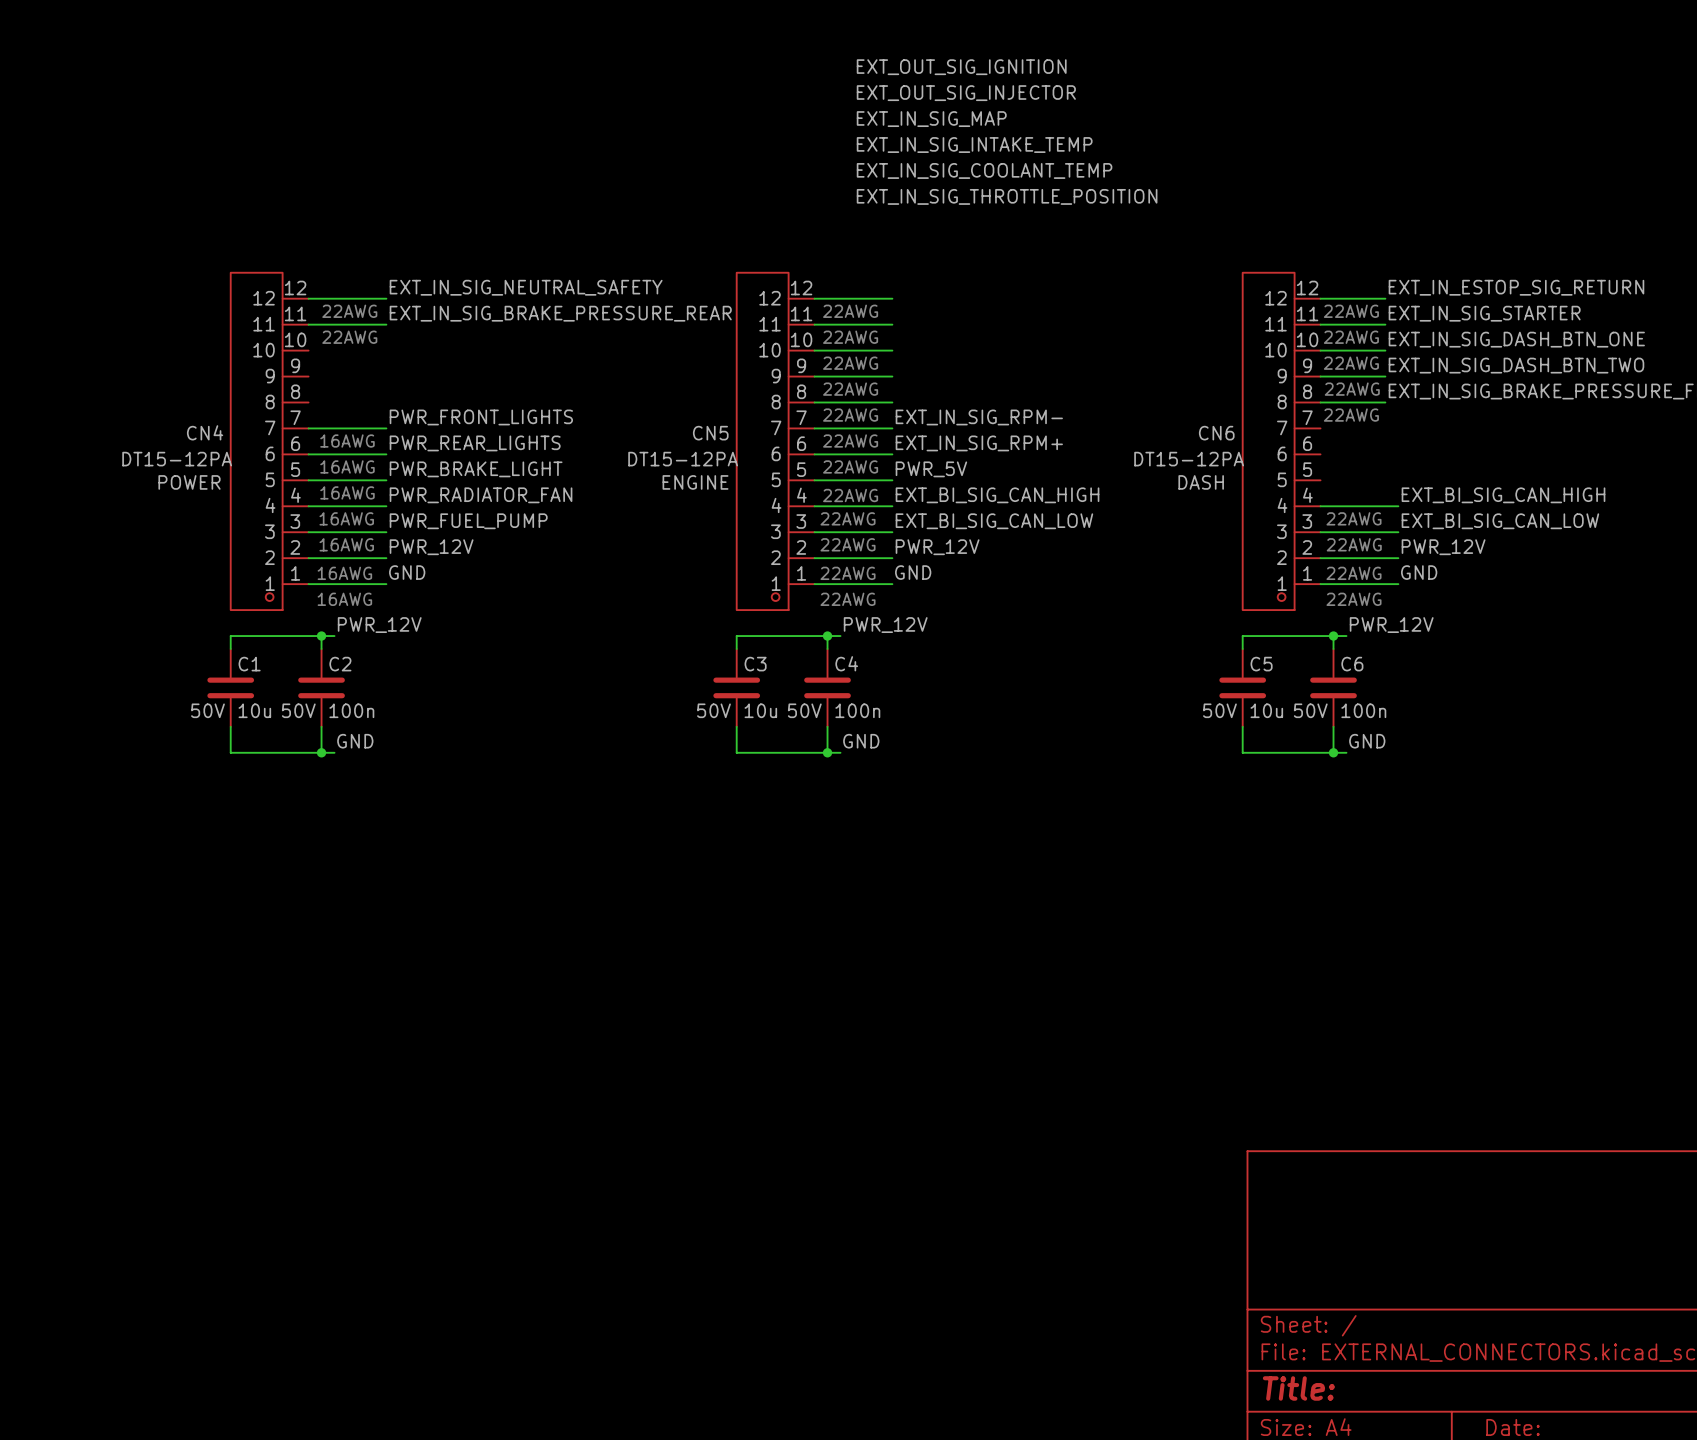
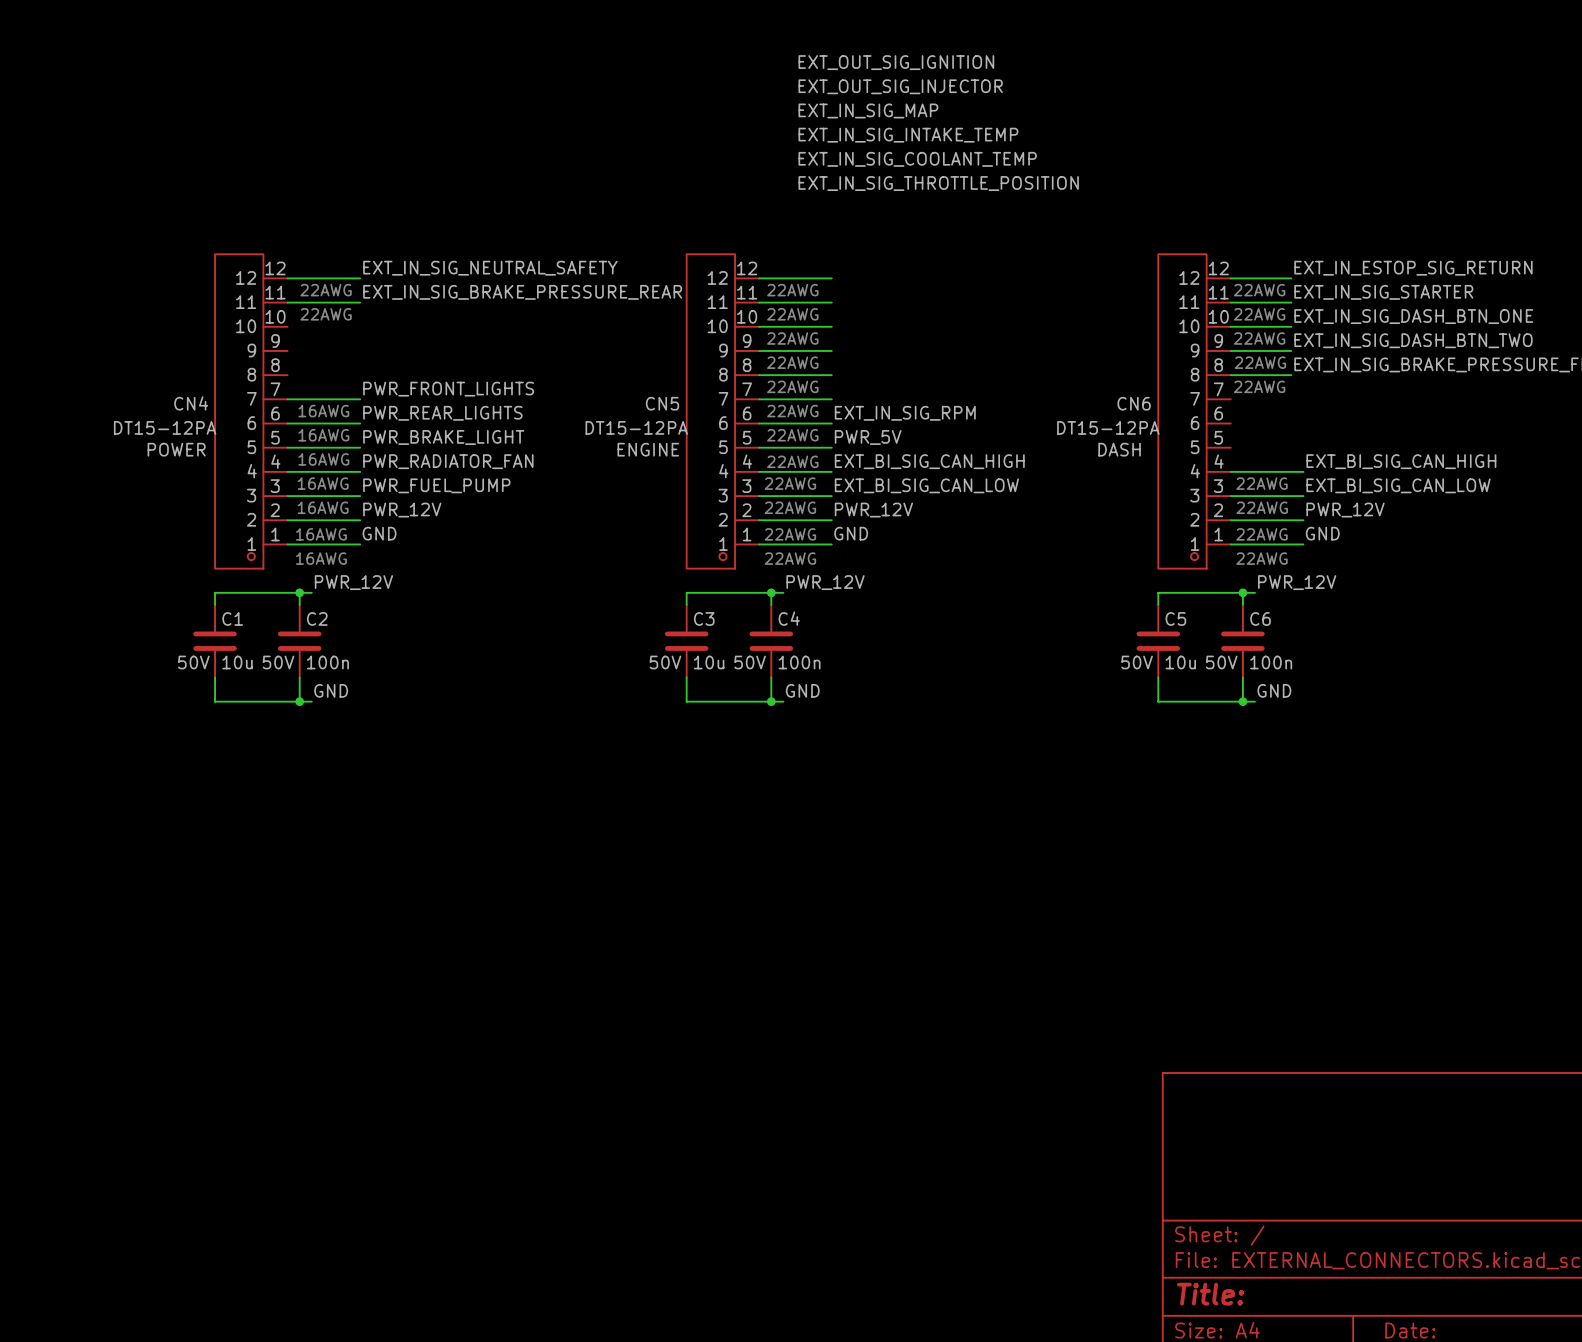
label: EXT_IN_SIG_RPM- (979, 417) -> none
label: EXT_IN_SIG_RPM+ (979, 443) -> EXT_IN_SIG_RPM (905, 413)

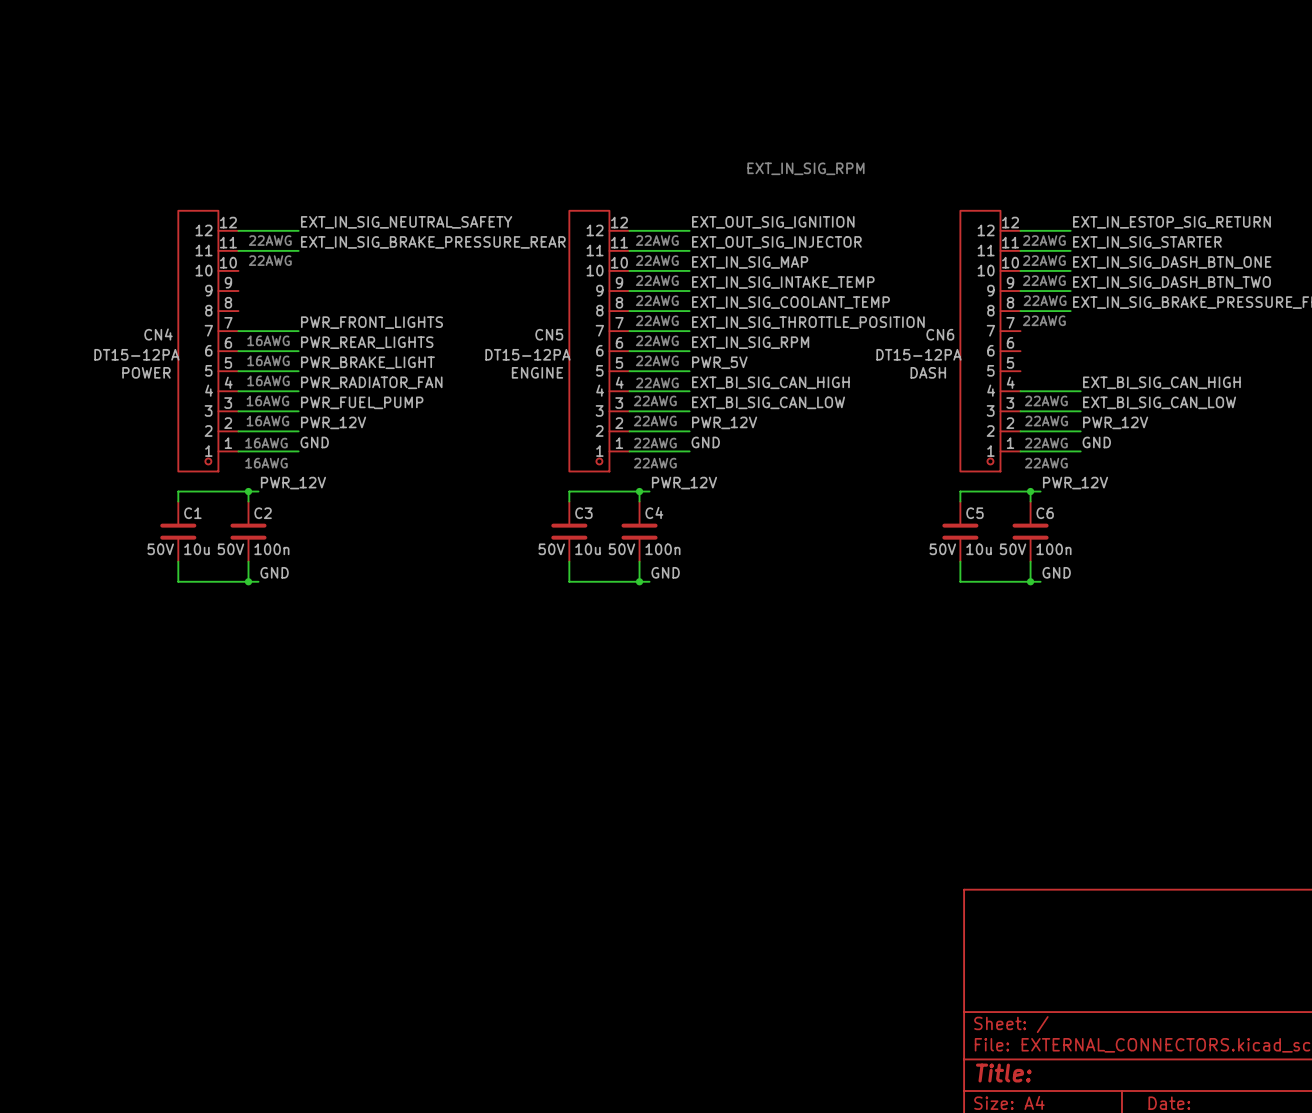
label position: EXT_OUT_SIG_IGNITION (896, 62) -> EXT_OUT_SIG_IGNITION (773, 222)
label position: EXT_OUT_SIG_INJECTOR (900, 86) -> EXT_OUT_SIG_INJECTOR (776, 242)
label position: EXT_IN_SIG_MAP (868, 110) -> EXT_IN_SIG_MAP (750, 262)
label position: EXT_IN_SIG_INTAKE_TEMP (908, 135) -> EXT_IN_SIG_INTAKE_TEMP (783, 282)
label position: EXT_IN_SIG_COOLANT_TEMP (917, 159) -> EXT_IN_SIG_COOLANT_TEMP (790, 302)
label position: EXT_IN_SIG_THROTTLE_POSITION (938, 183) -> EXT_IN_SIG_THROTTLE_POSITION (808, 322)
text: none -> EXT_IN_SIG_RPM (805, 168)

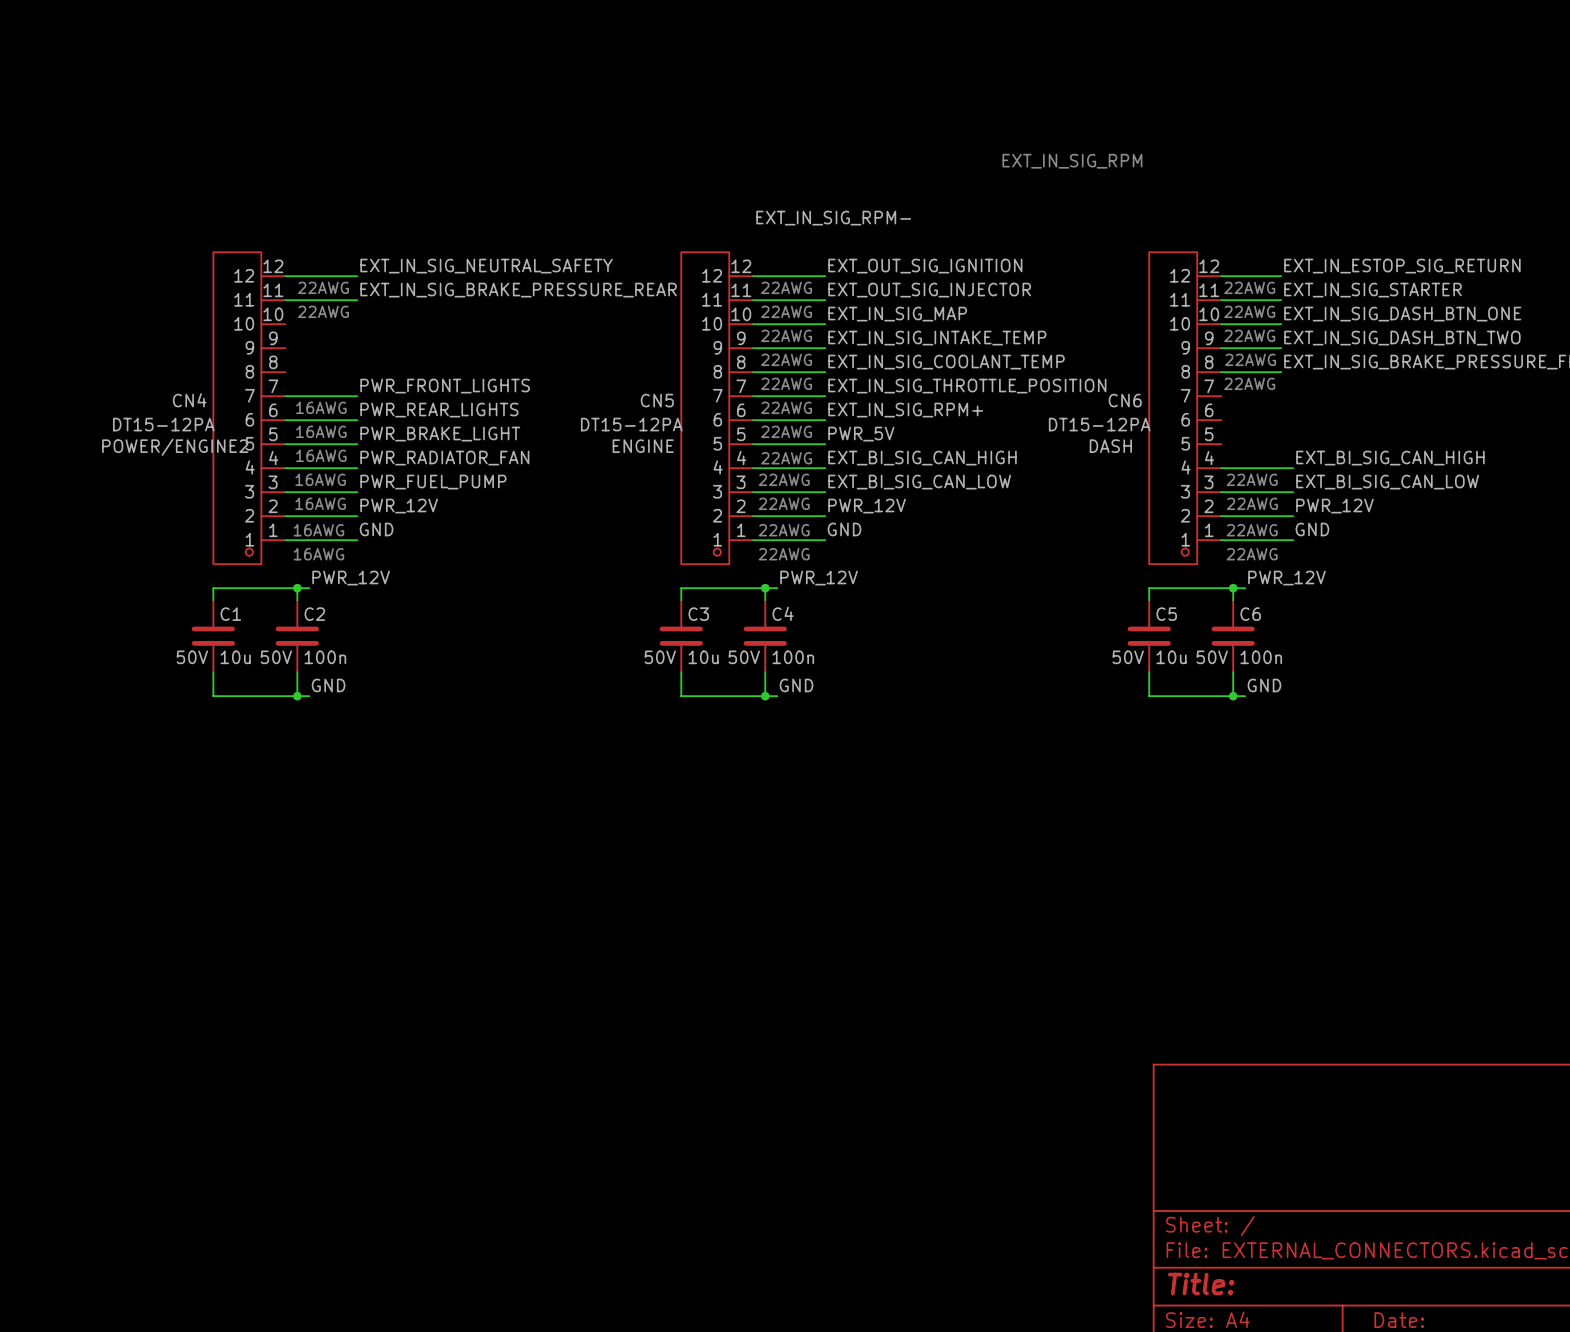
text position: EXT_IN_SIG_RPM (805, 168) -> EXT_IN_SIG_RPM (1072, 161)
label: none -> EXT_IN_SIG_RPM- (833, 218)
label: EXT_IN_SIG_RPM (750, 342) -> EXT_IN_SIG_RPM+ (905, 410)
CN4 text: POWER (146, 372) -> POWER/ENGINE2 (175, 447)

